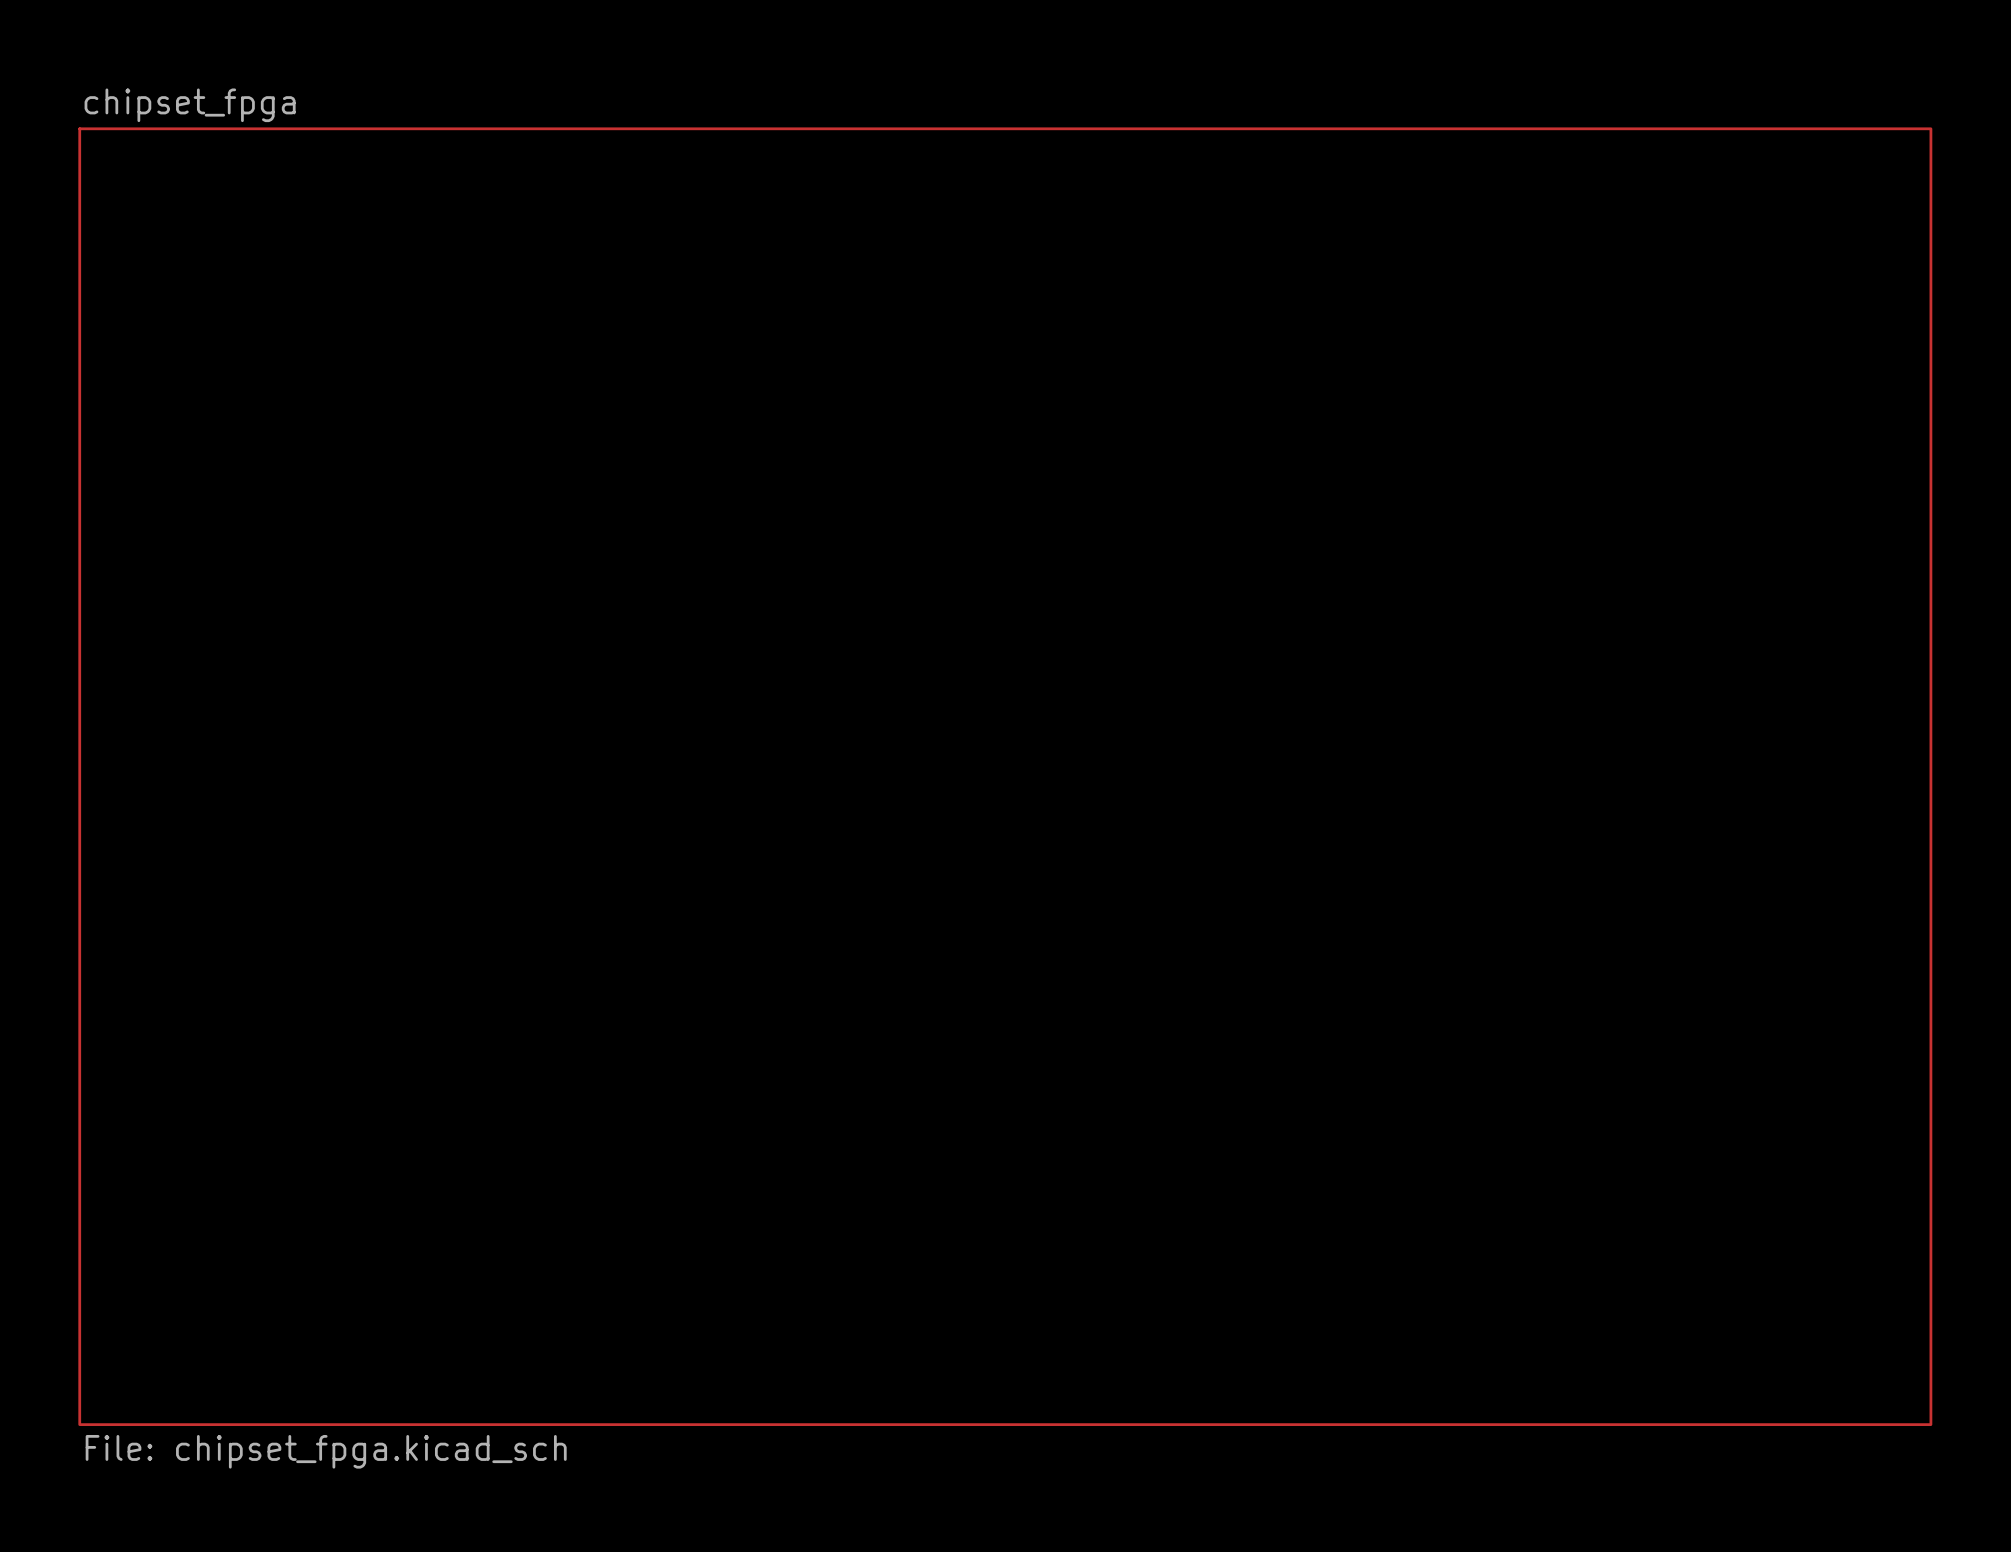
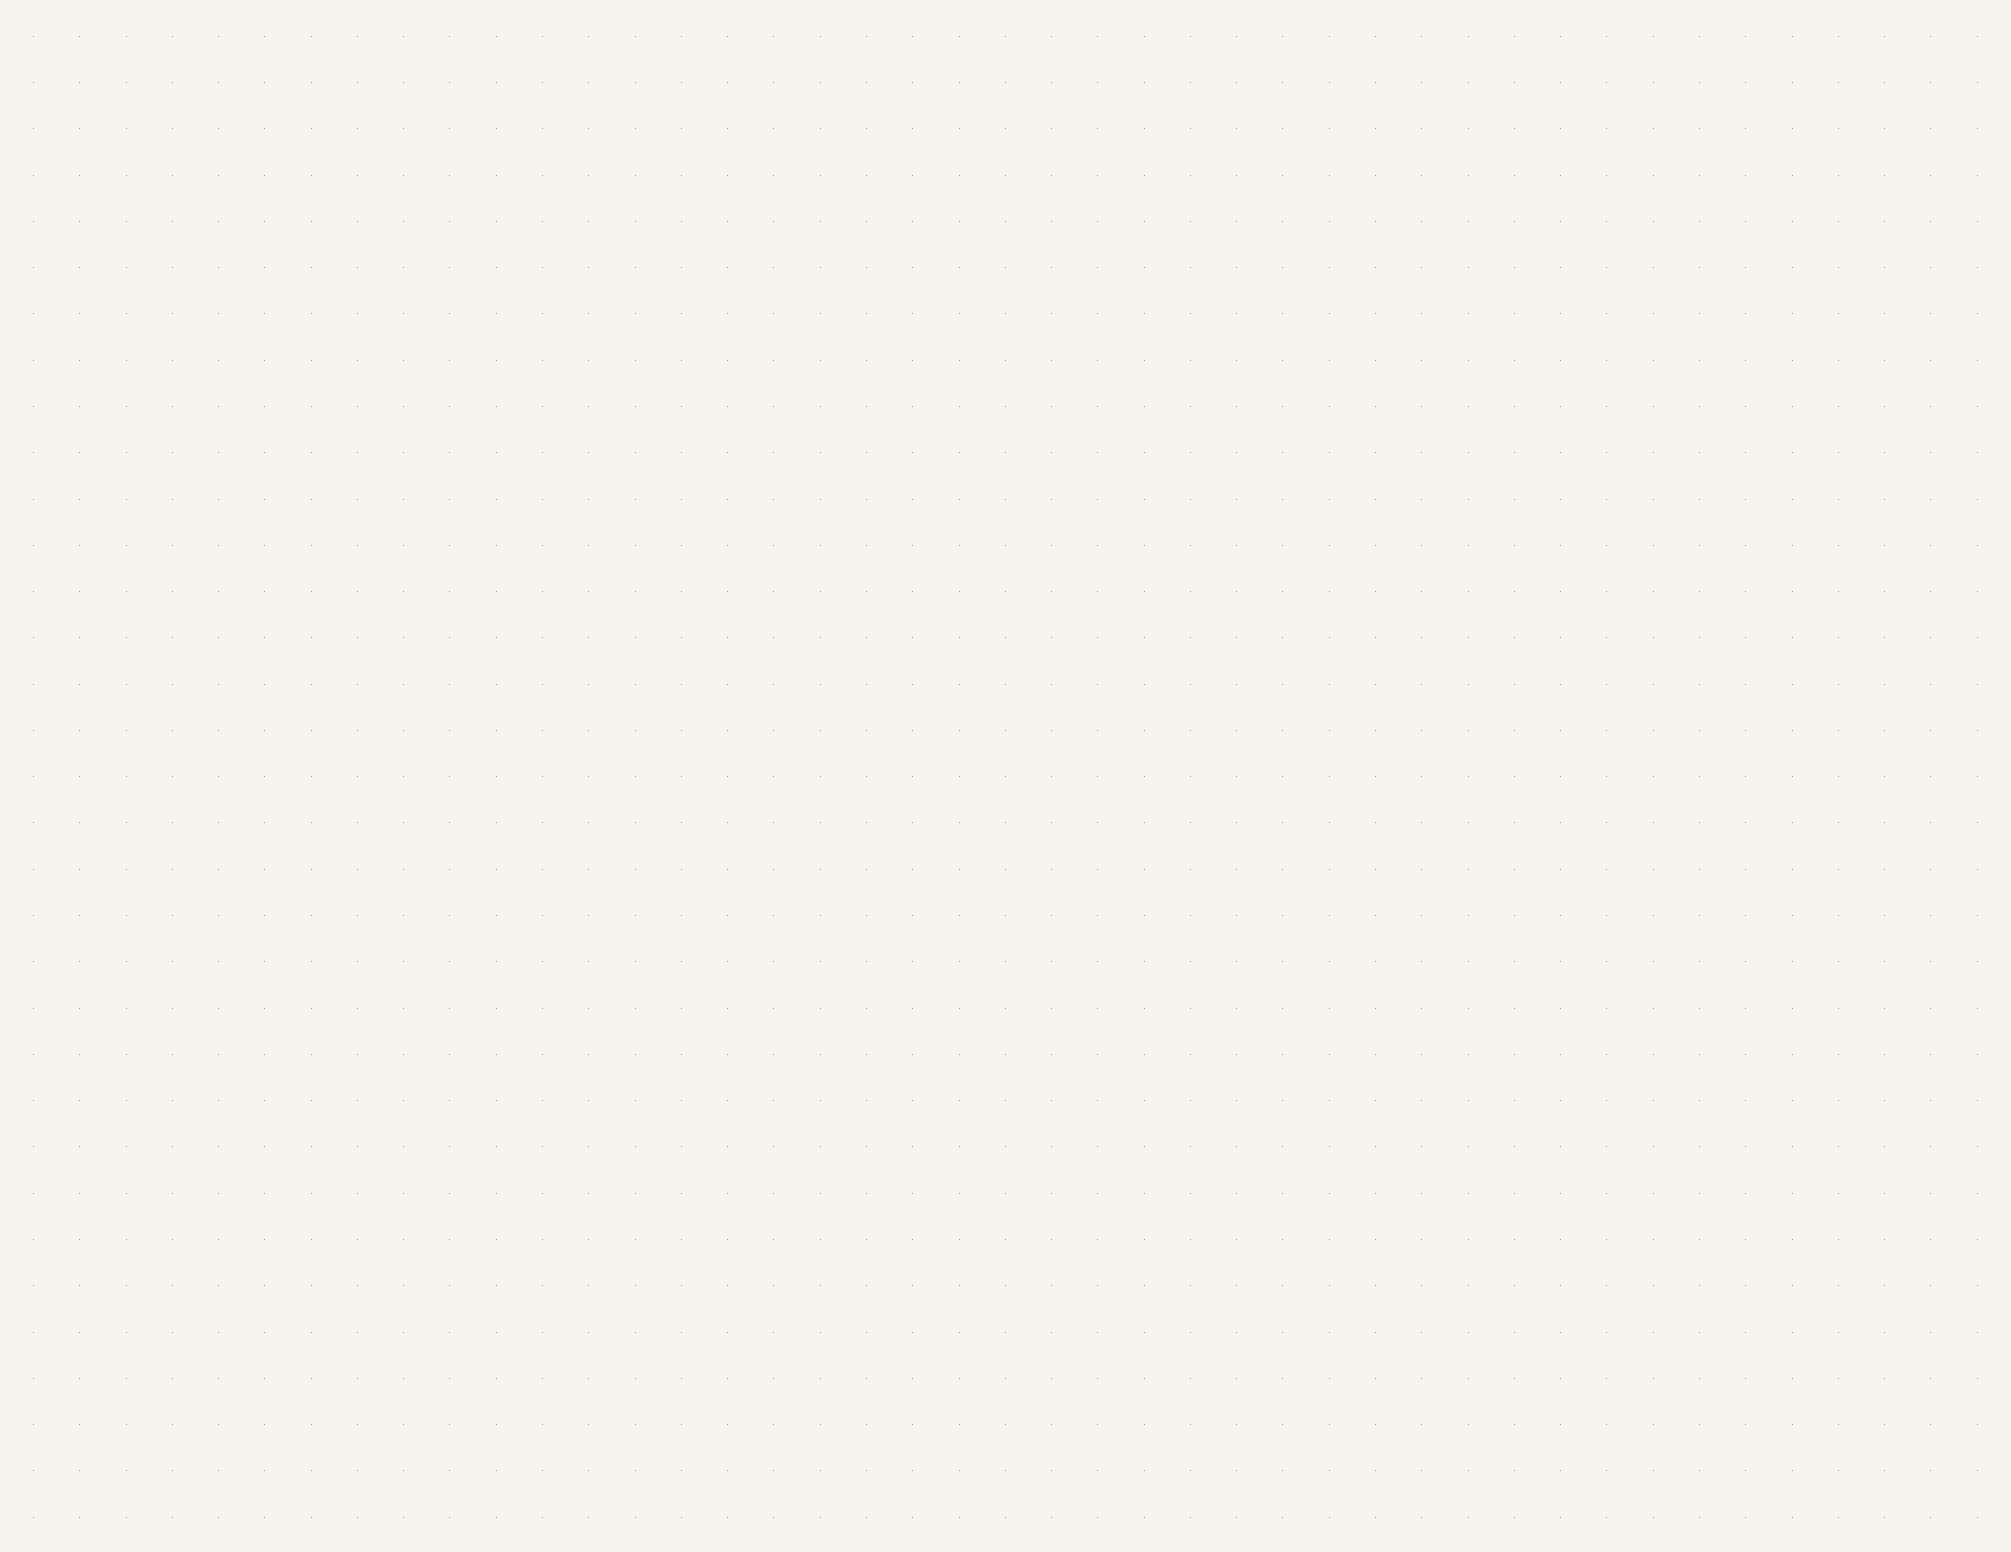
sheet chipset_fpga: File: chipset_fpga.kicad_sch (1005, 776) -> none

